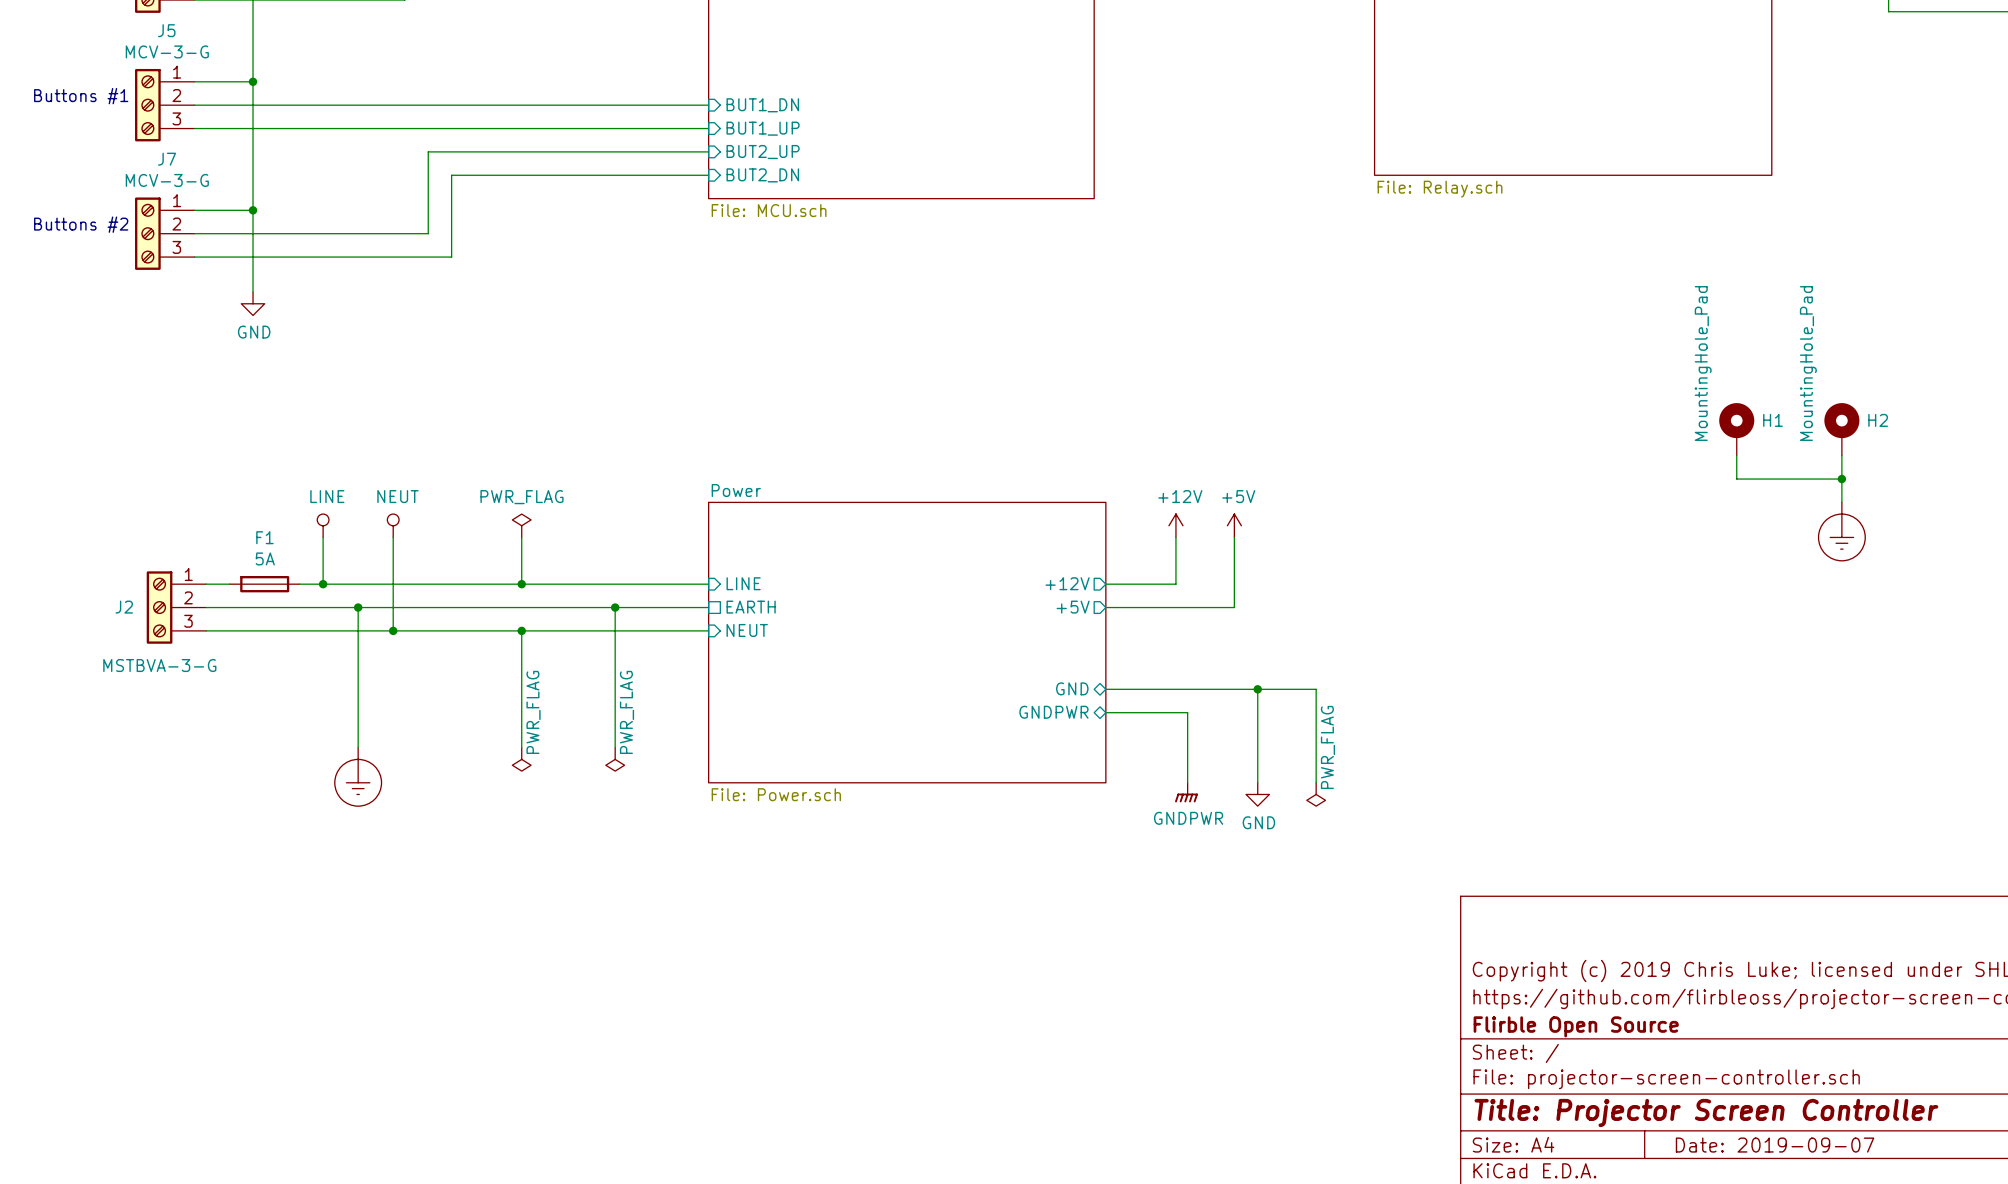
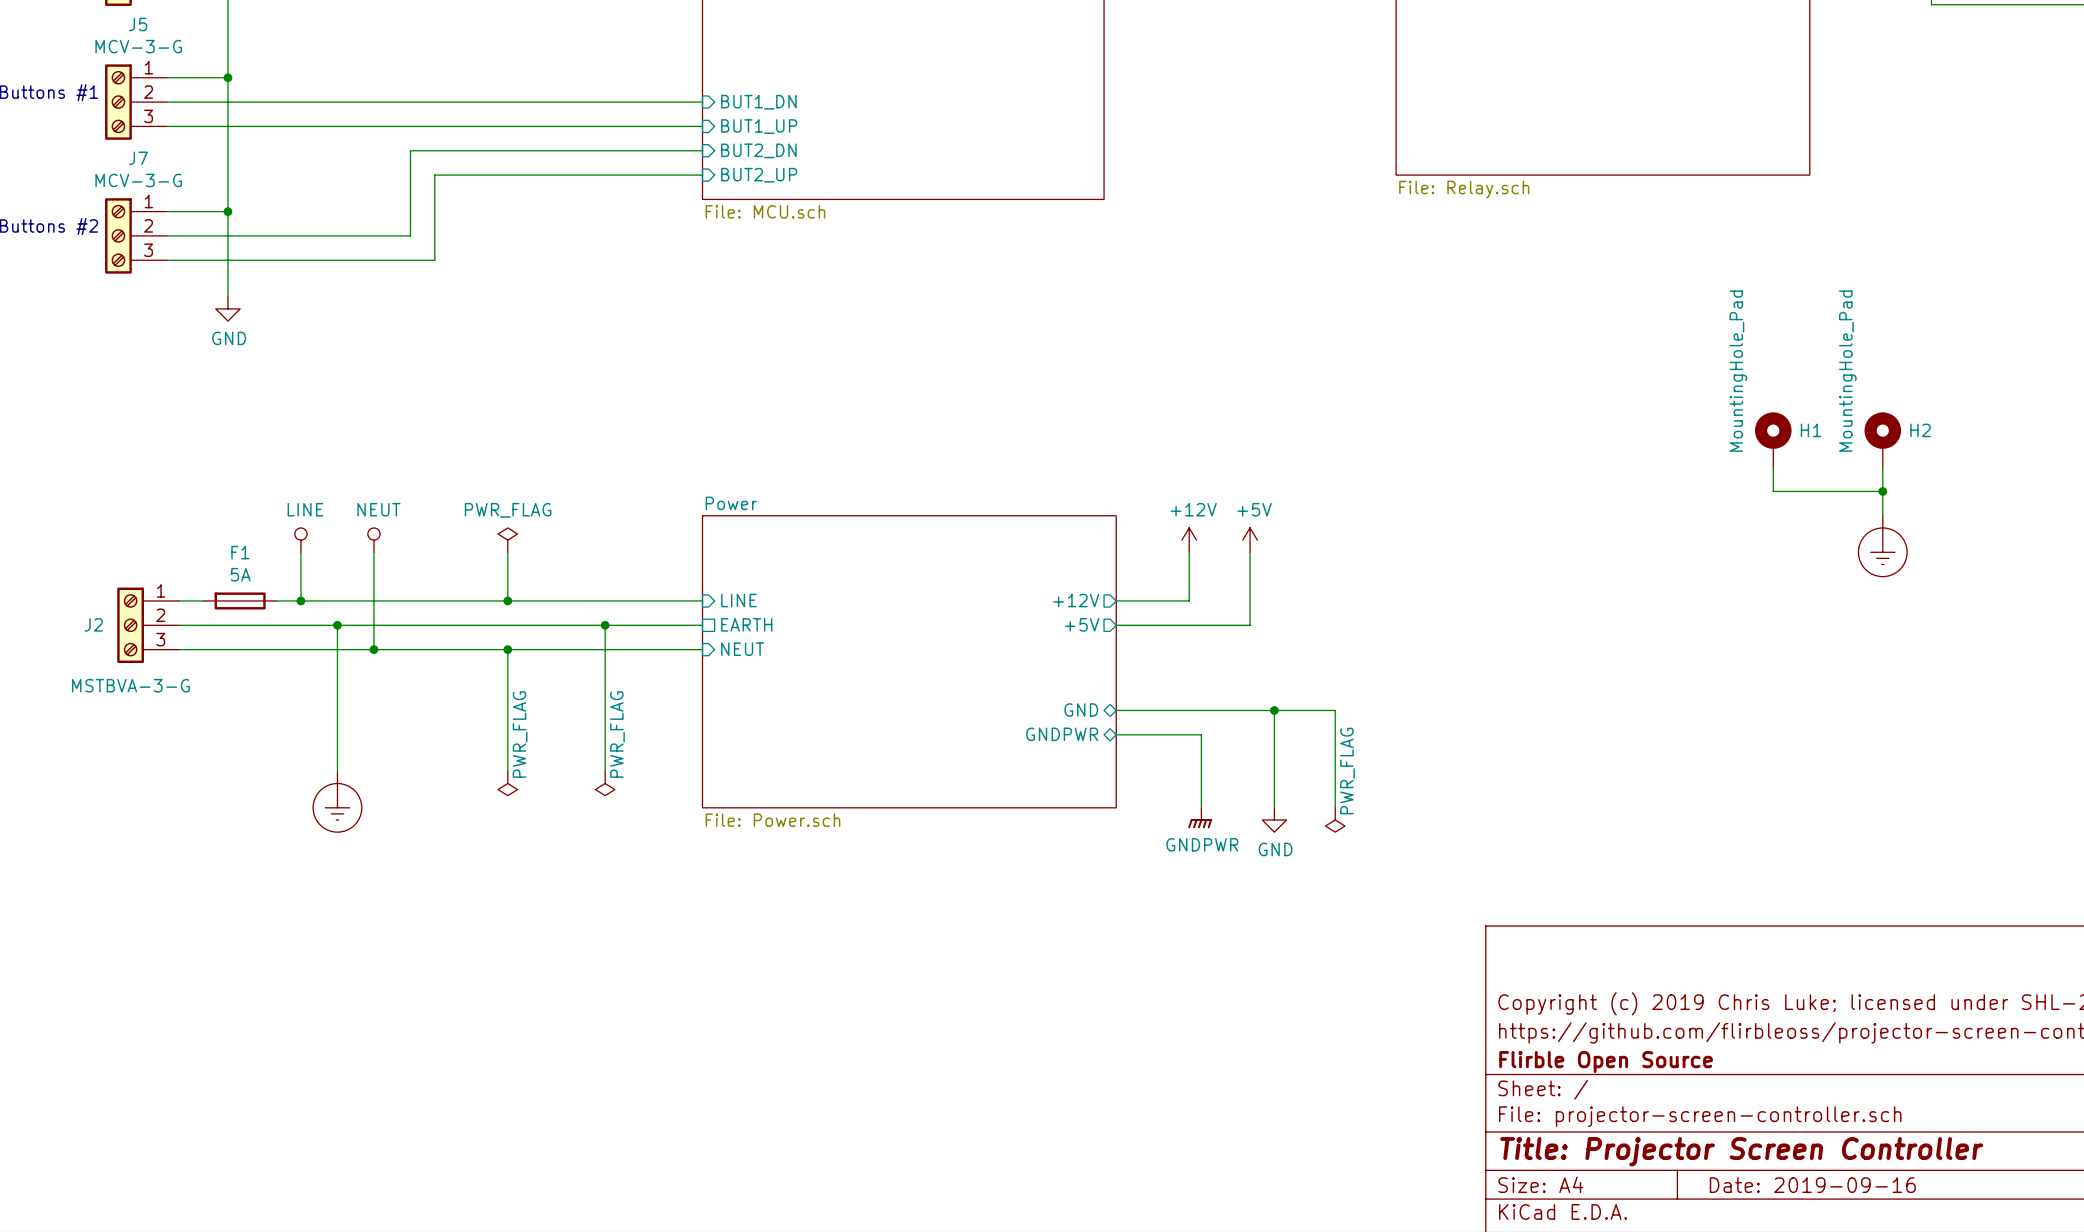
sheet pin: BUT2_UP (763, 152) -> BUT2_DN (758, 150)
sheet pin: BUT2_DN (762, 175) -> BUT2_UP (759, 175)
title block: Date: 2019-09-07 (1775, 1145) -> Date: 2019-09-16 (1812, 1185)

